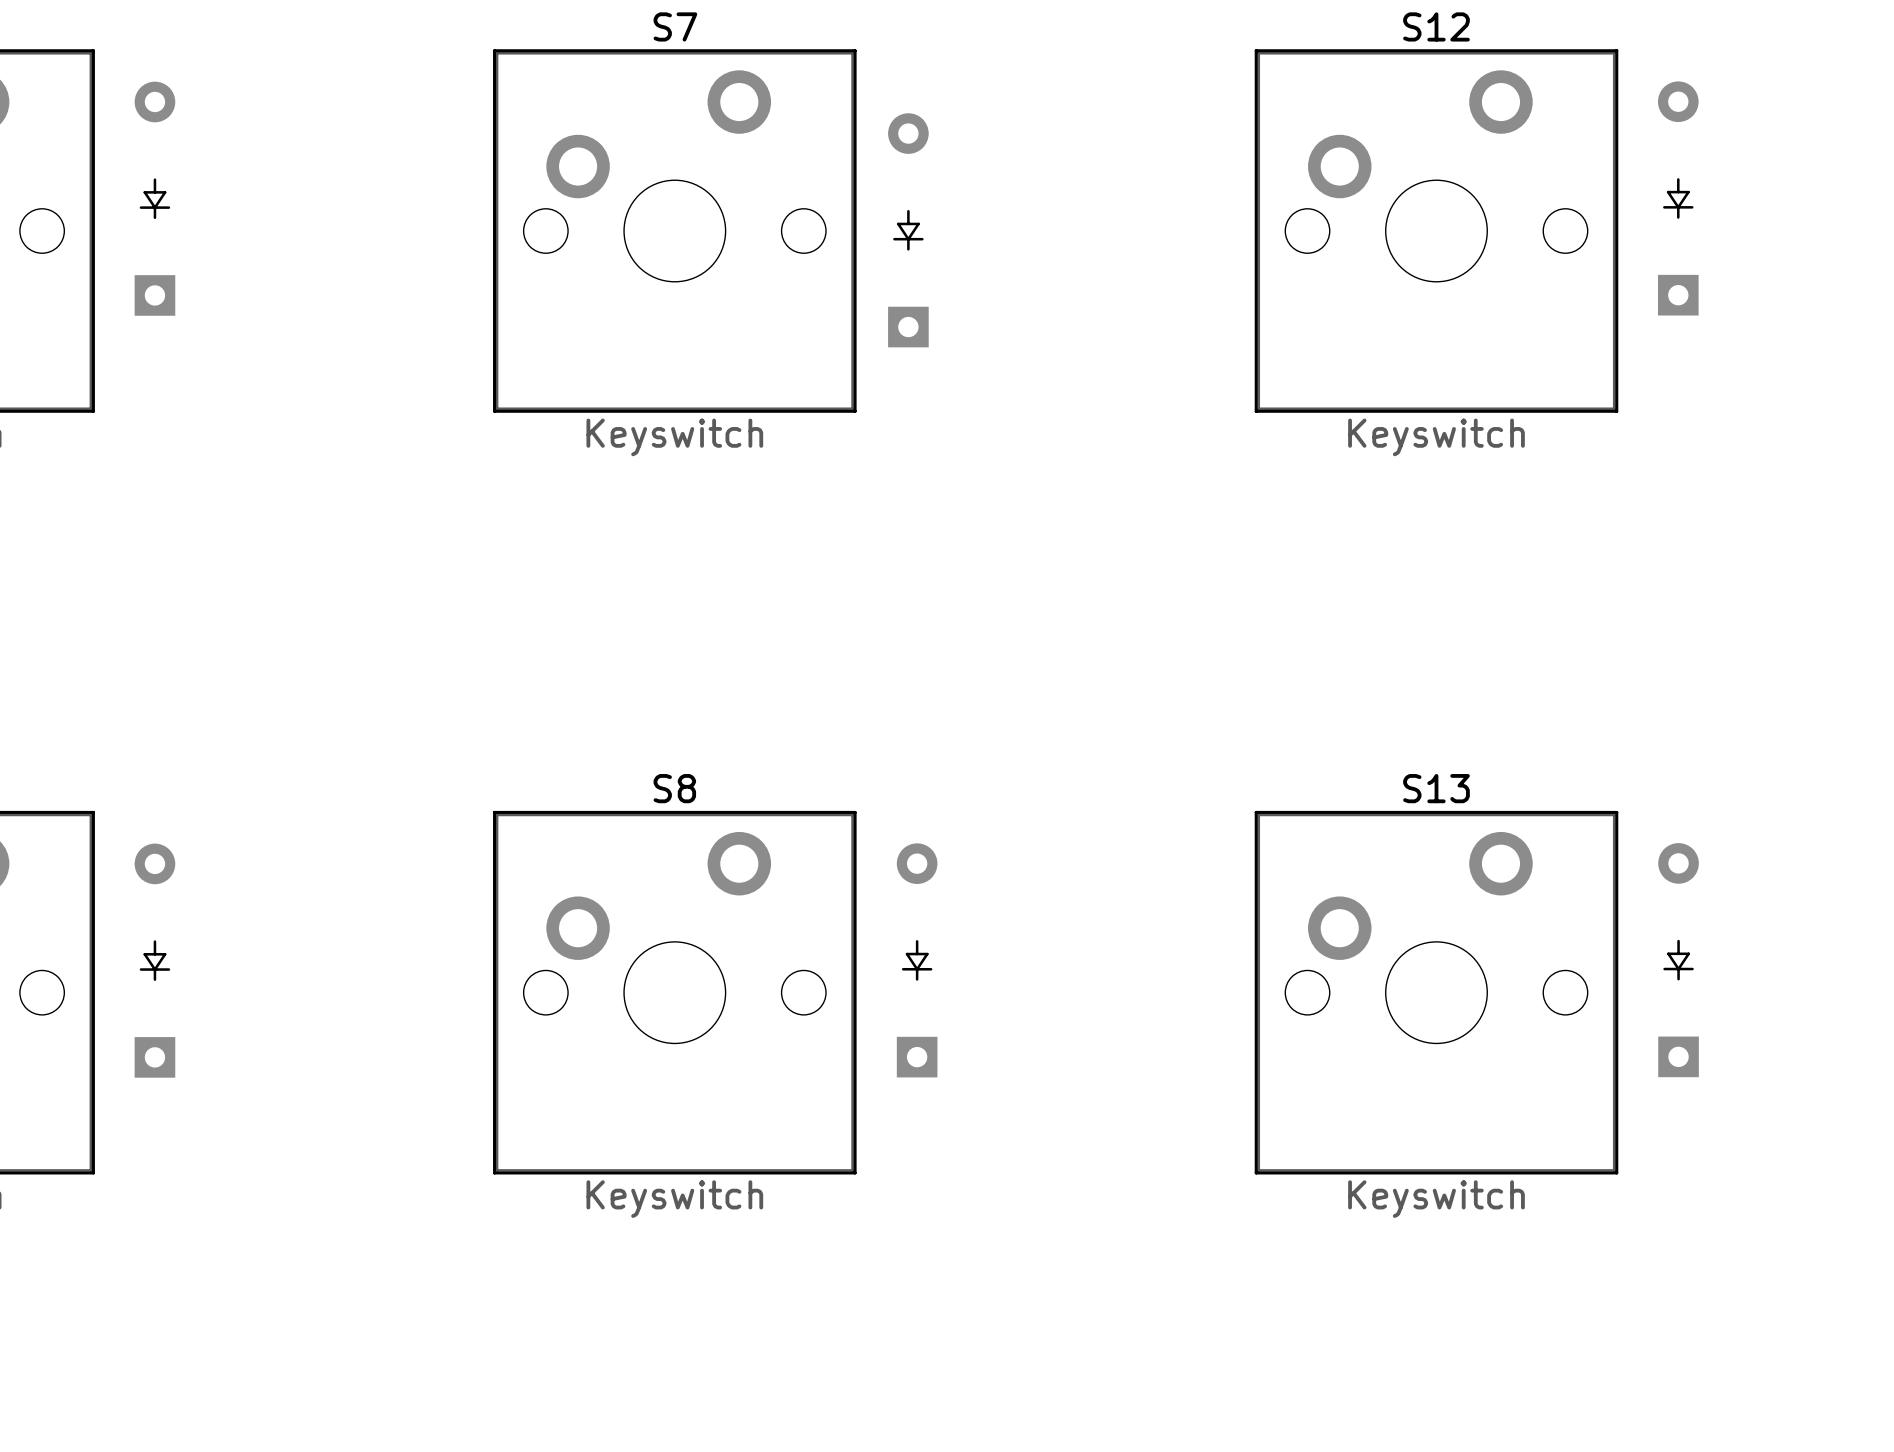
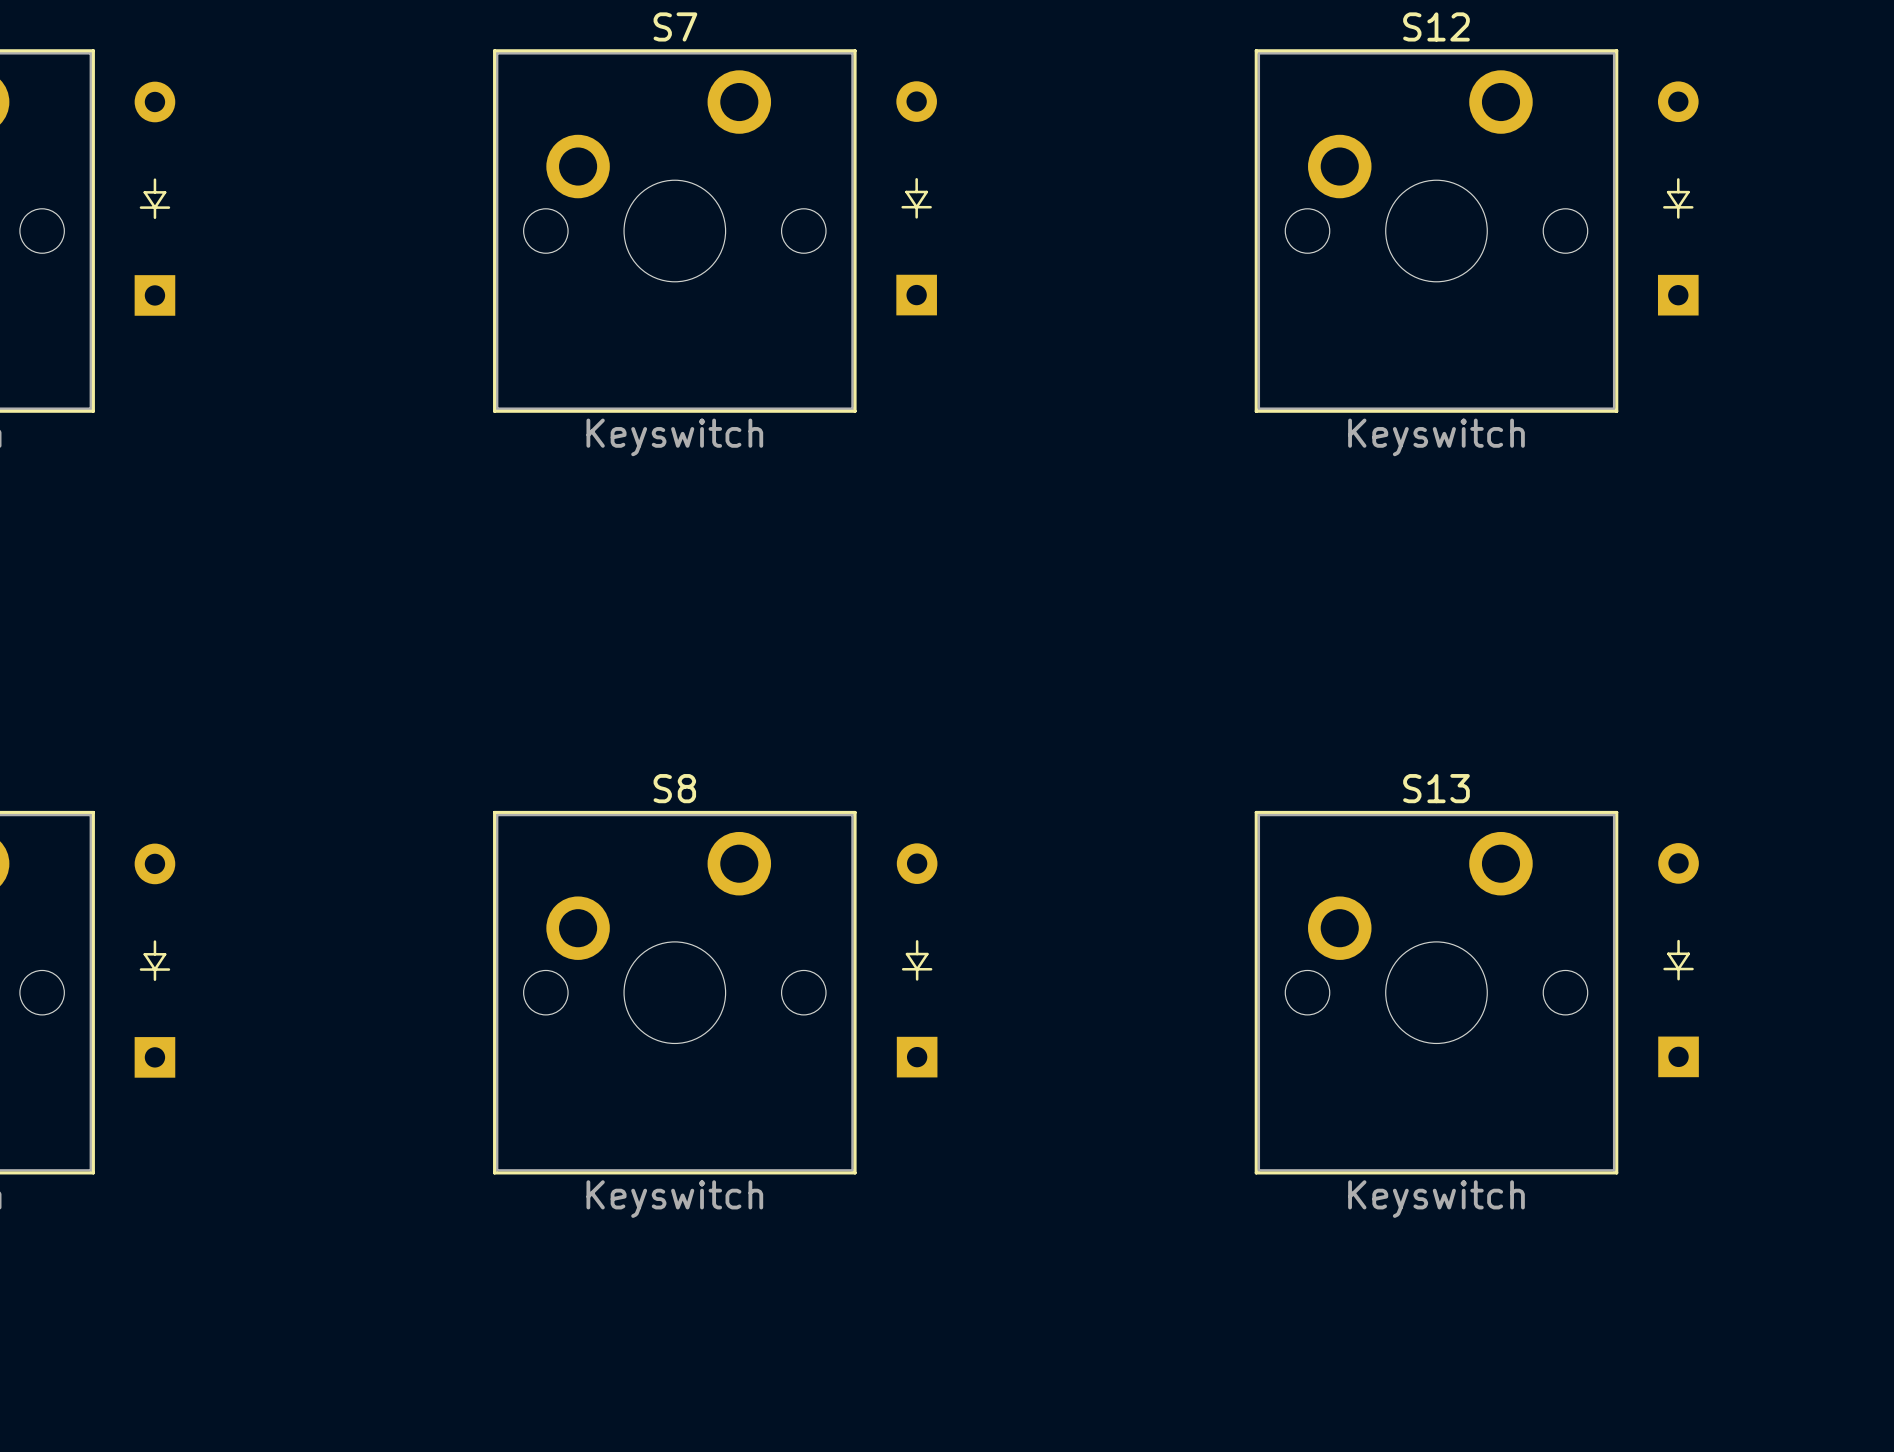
part position: (908, 230) -> (916, 198)

